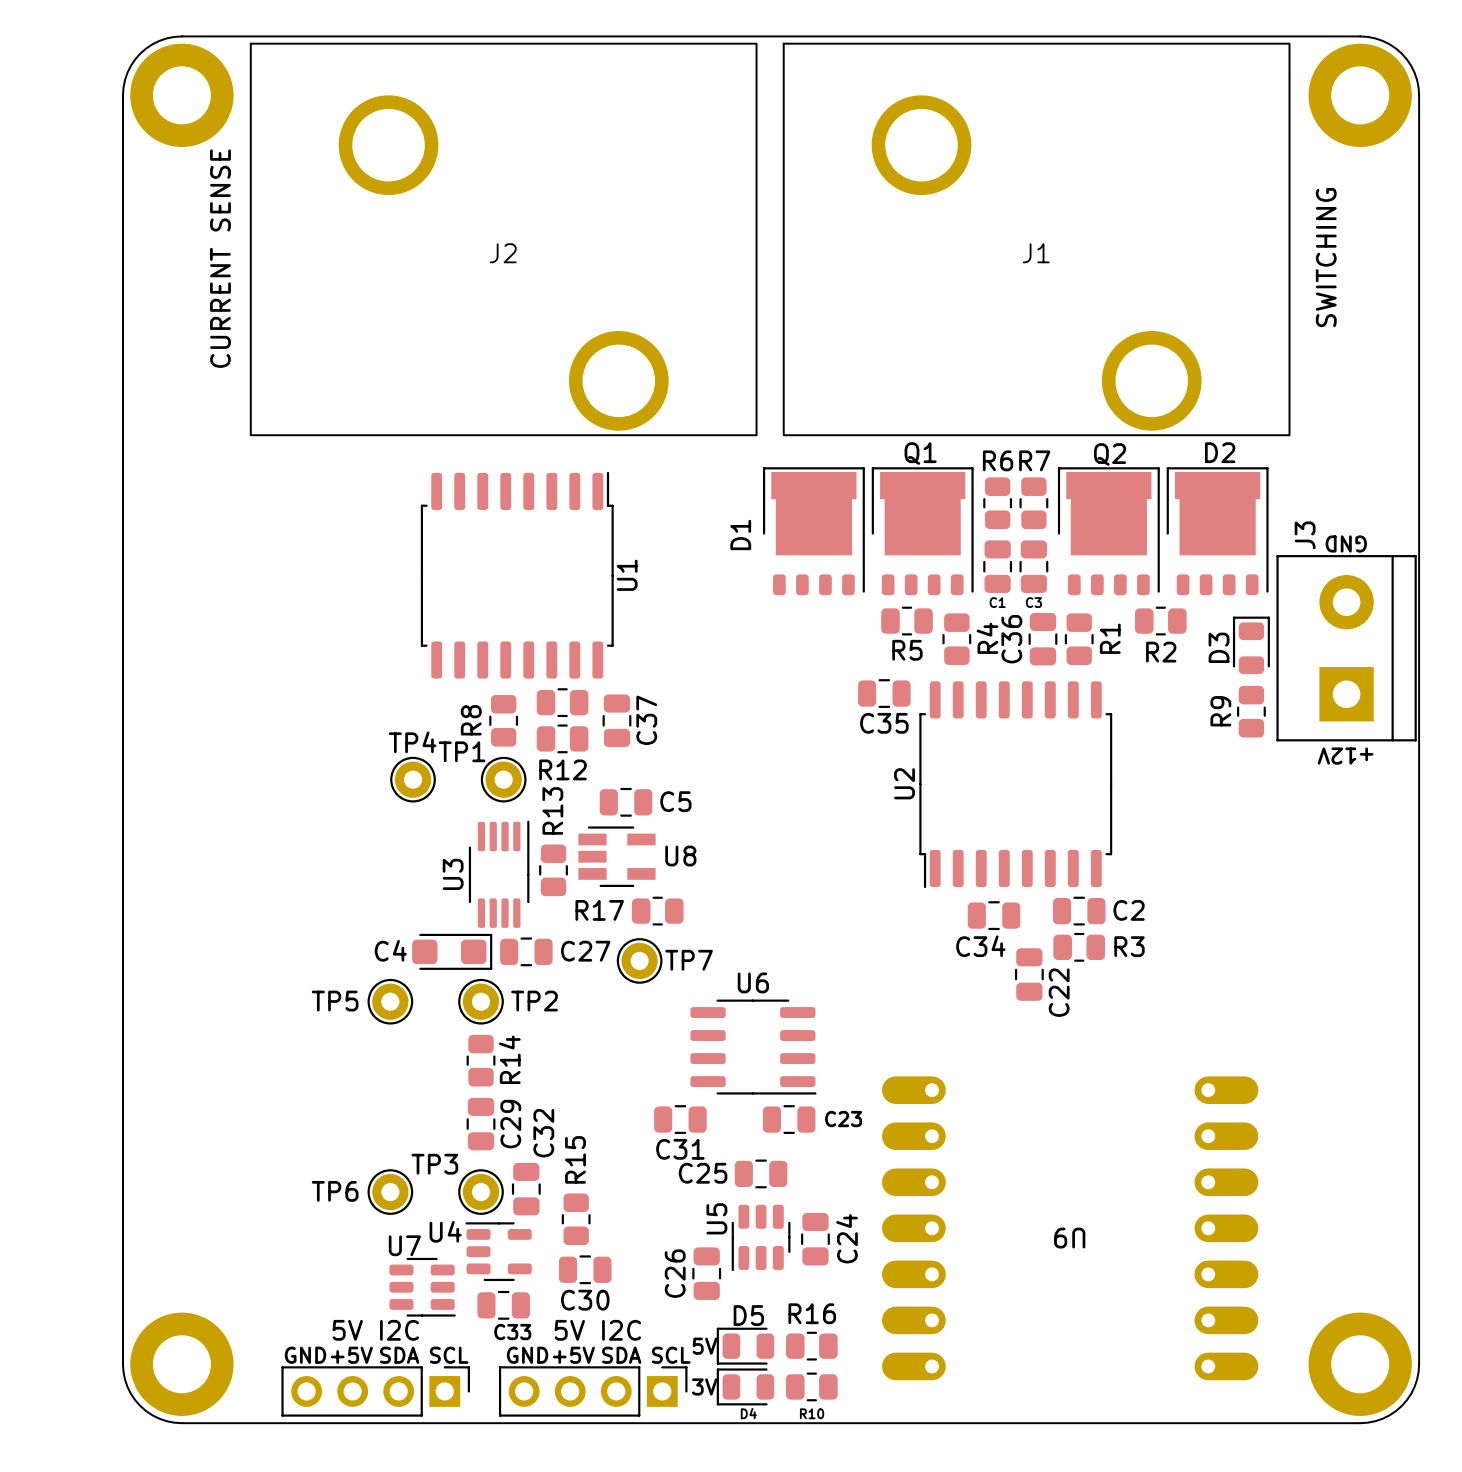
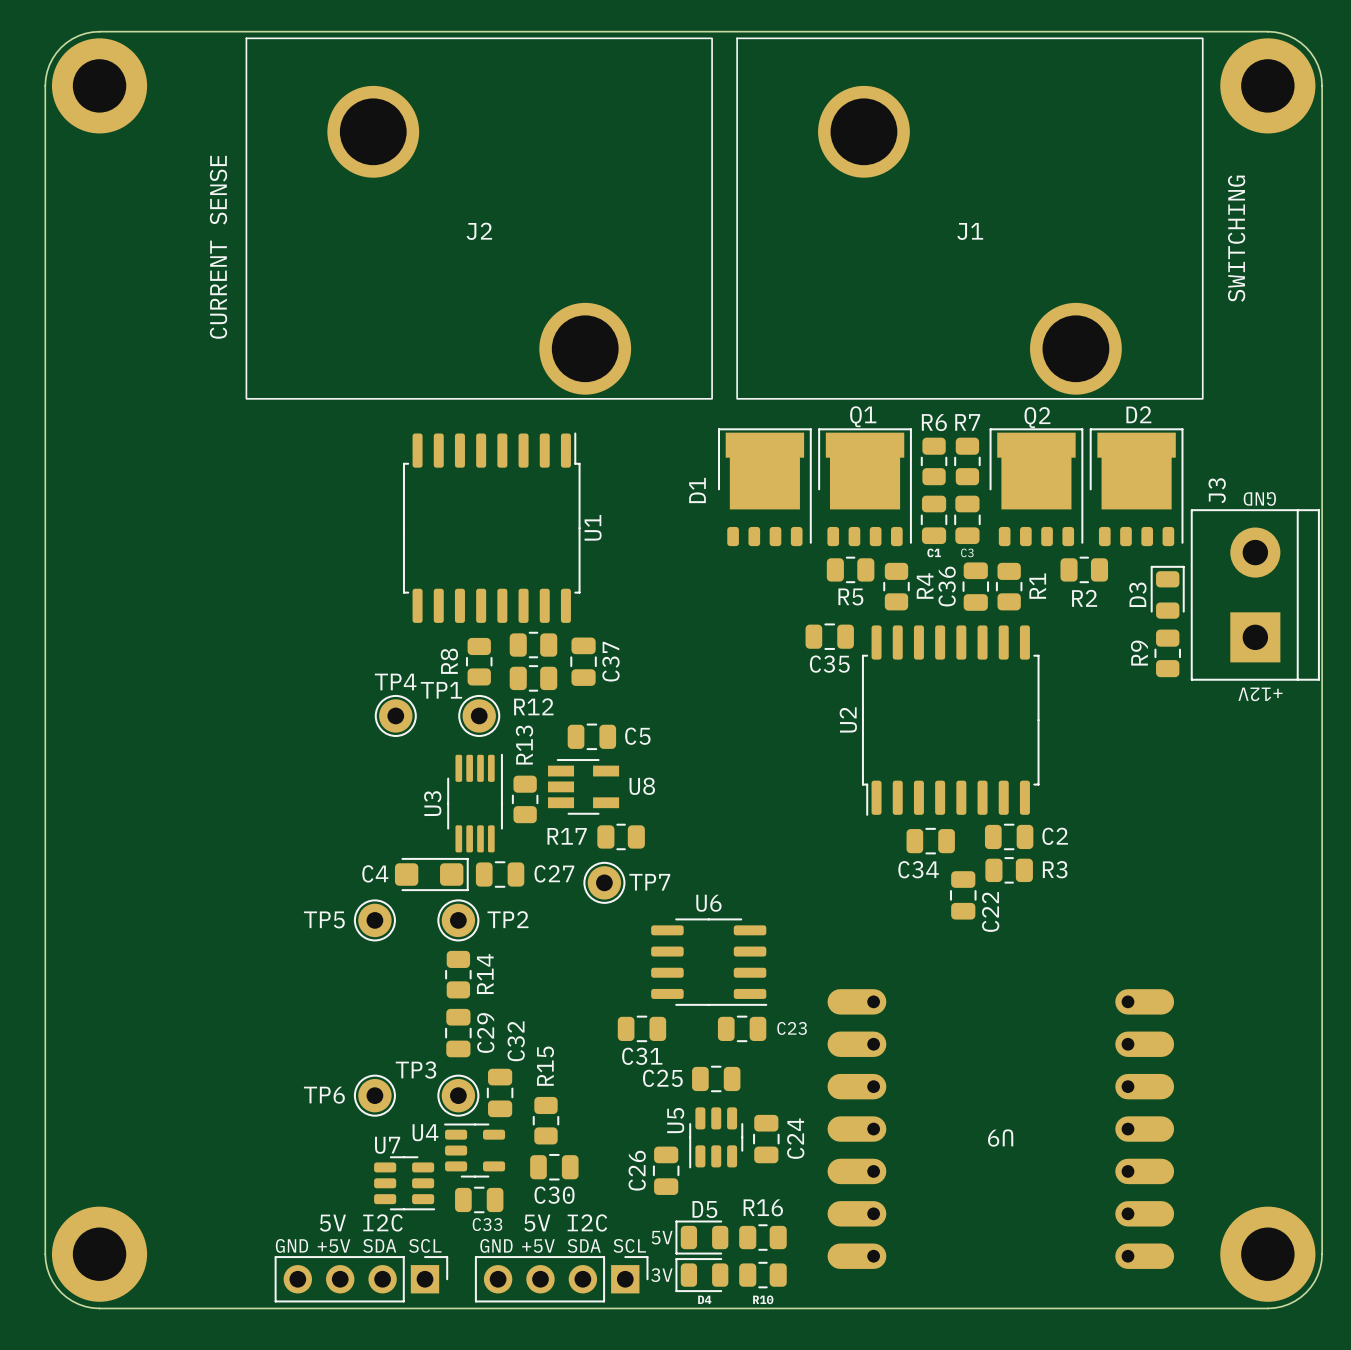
board edge: (181, 36) (159, 40) (140, 53) (127, 72) (122, 95) (122, 1364) (127, 1386) (140, 1405) (159, 1418) (181, 1423) -> (182, 31) (99, 31) (78, 35) (66, 42) (56, 52) (47, 71) (45, 85) (45, 1261) (49, 1274) (56, 1287) (66, 1297) (78, 1304) (99, 1308) (182, 1308)
part position: (181, 95) -> (99, 85)
part position: (181, 1364) -> (99, 1254)

